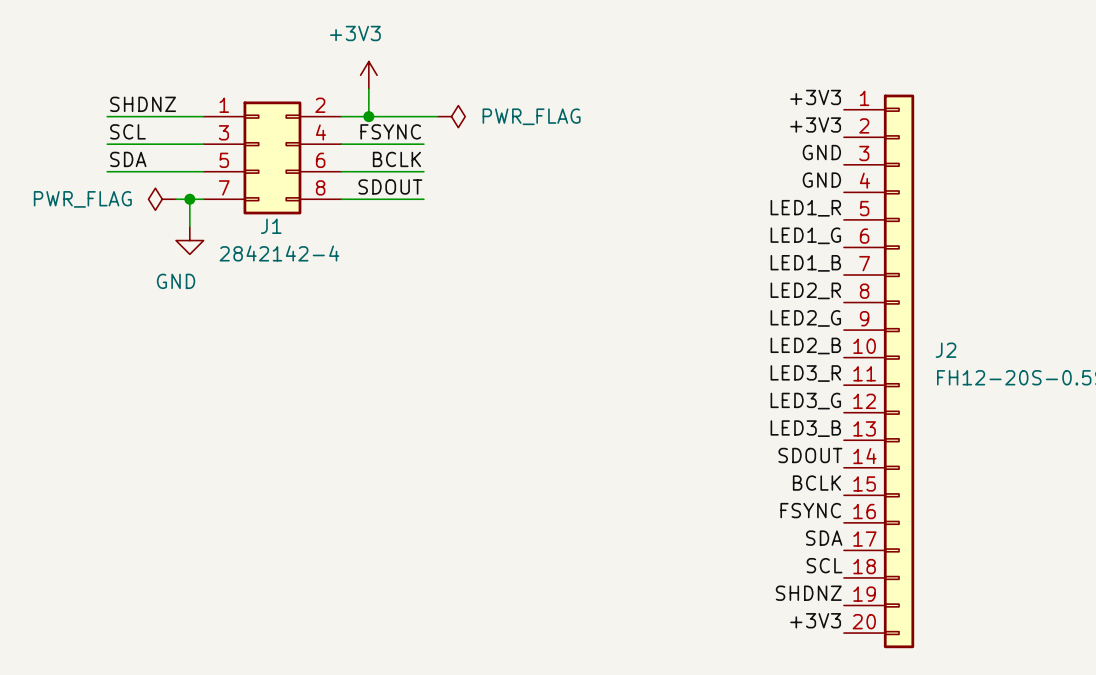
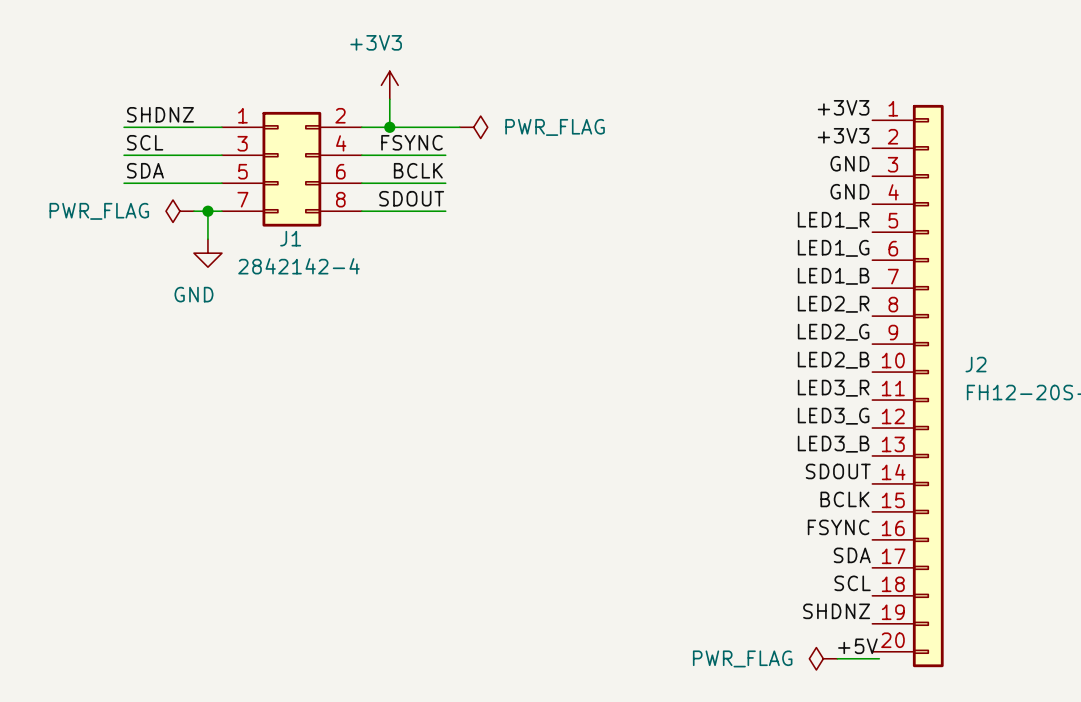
label: +3V3 (815, 620) -> +5V (857, 646)
power symbol: none -> PWR_FLAG (823, 658)
wire: none -> (837, 658) (879, 658)

